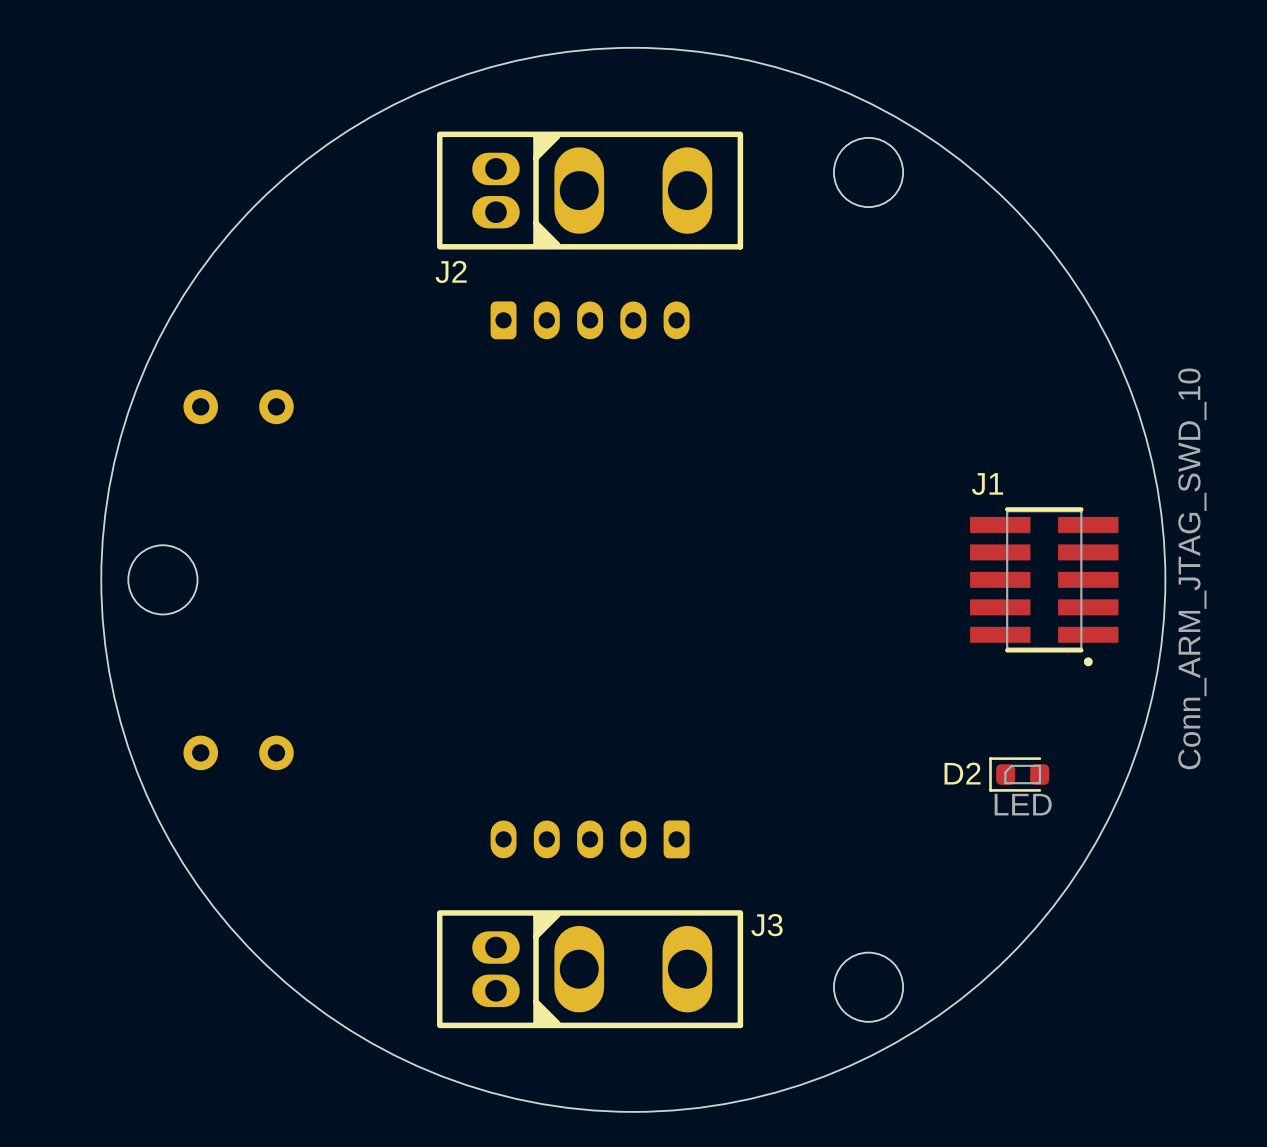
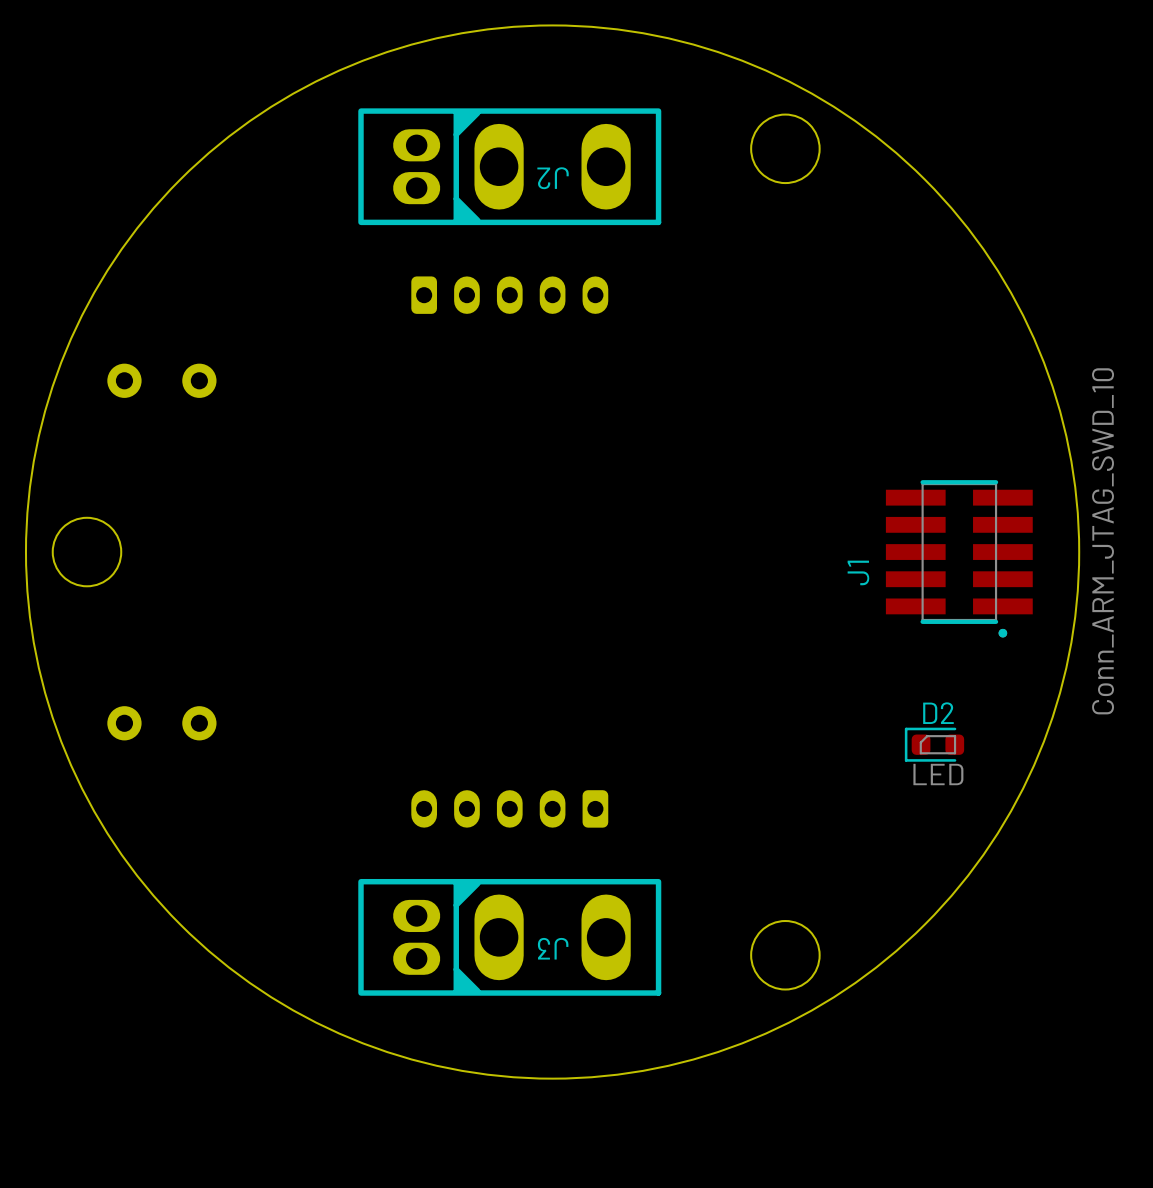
J2 name rotation: 0° (451, 271) -> 180° (553, 178)
J2 name position: J2 (451, 271) -> J2 (553, 178)
J1 name rotation: 0° (987, 484) -> 90° counterclockwise (858, 572)
J1 name position: J1 (987, 484) -> J1 (858, 572)
D2 name position: D2 (962, 773) -> D2 (938, 713)
J3 name rotation: 0° (766, 925) -> 180° (553, 948)
J3 name position: J3 (766, 925) -> J3 (553, 948)

